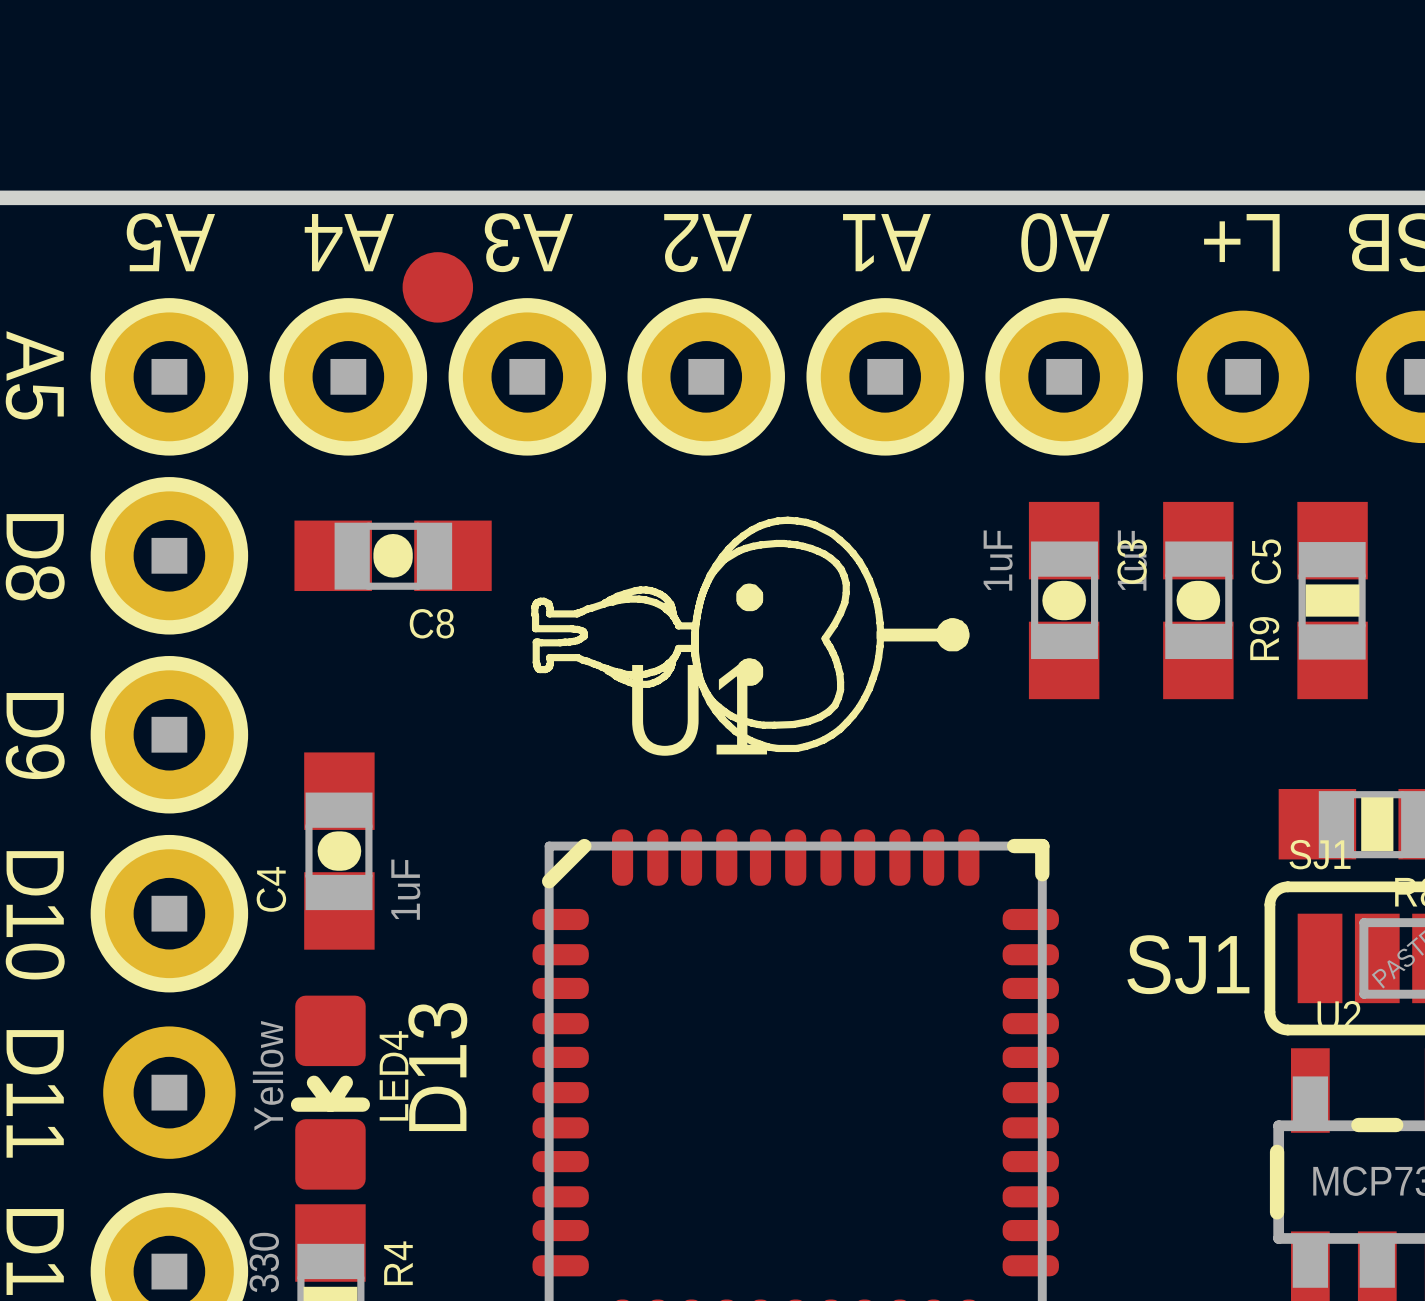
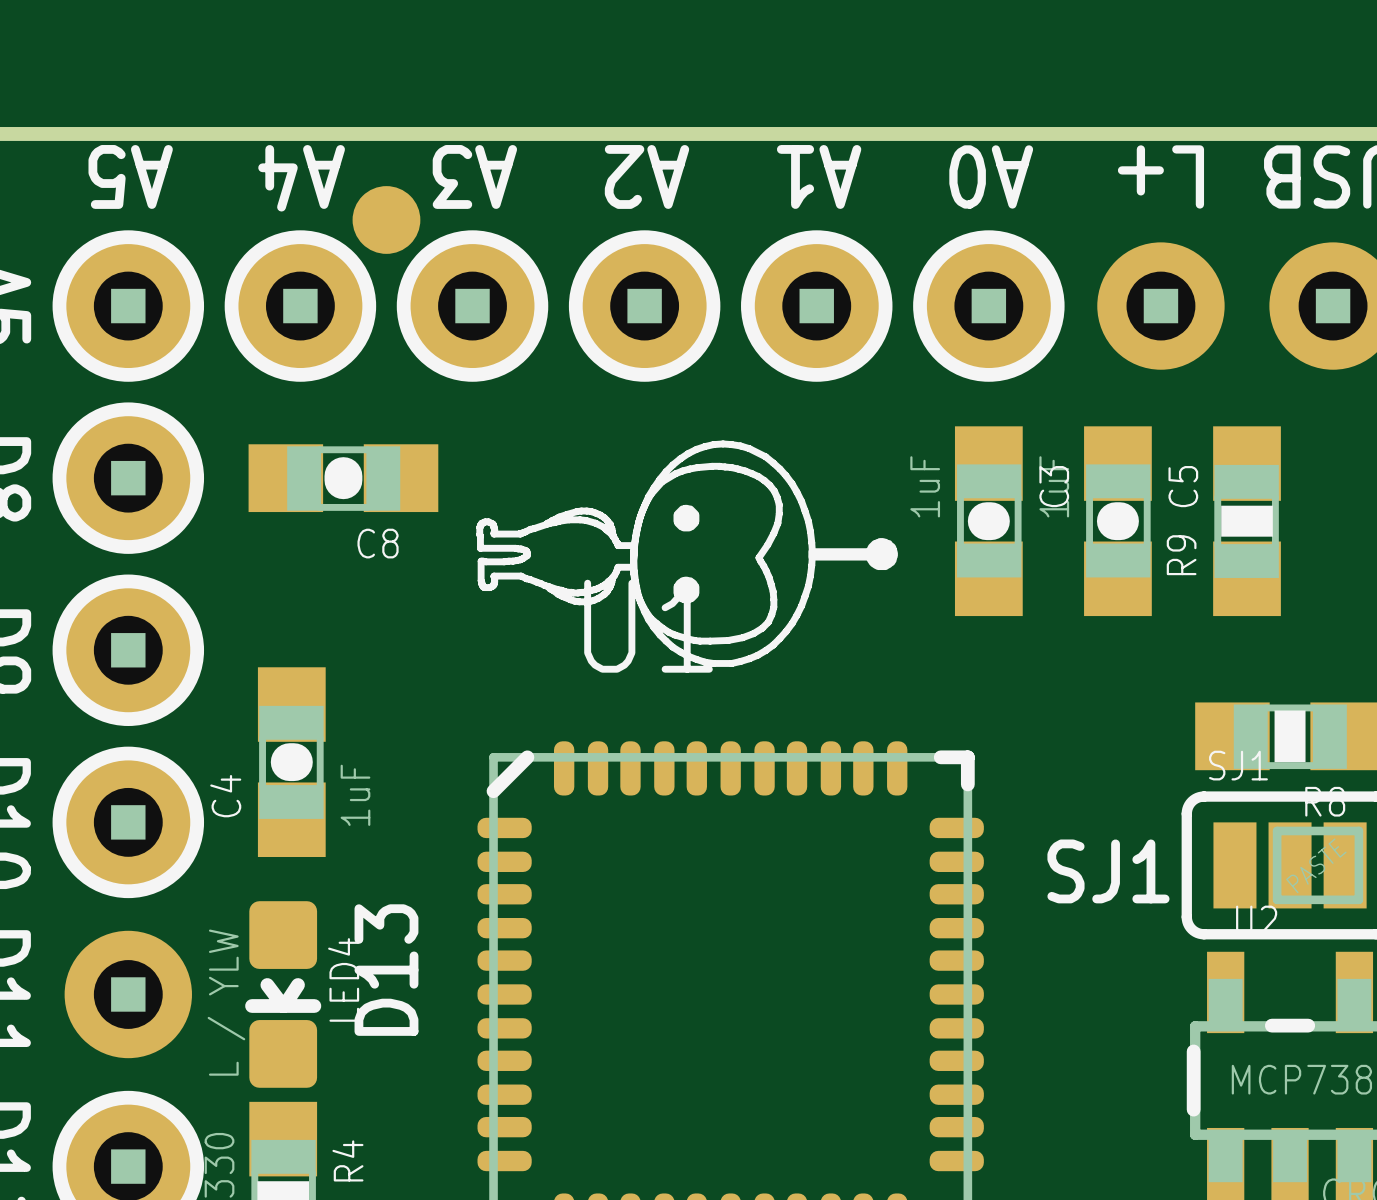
LED4 value: Yellow (268, 1075) -> L / YLW (226, 1002)

